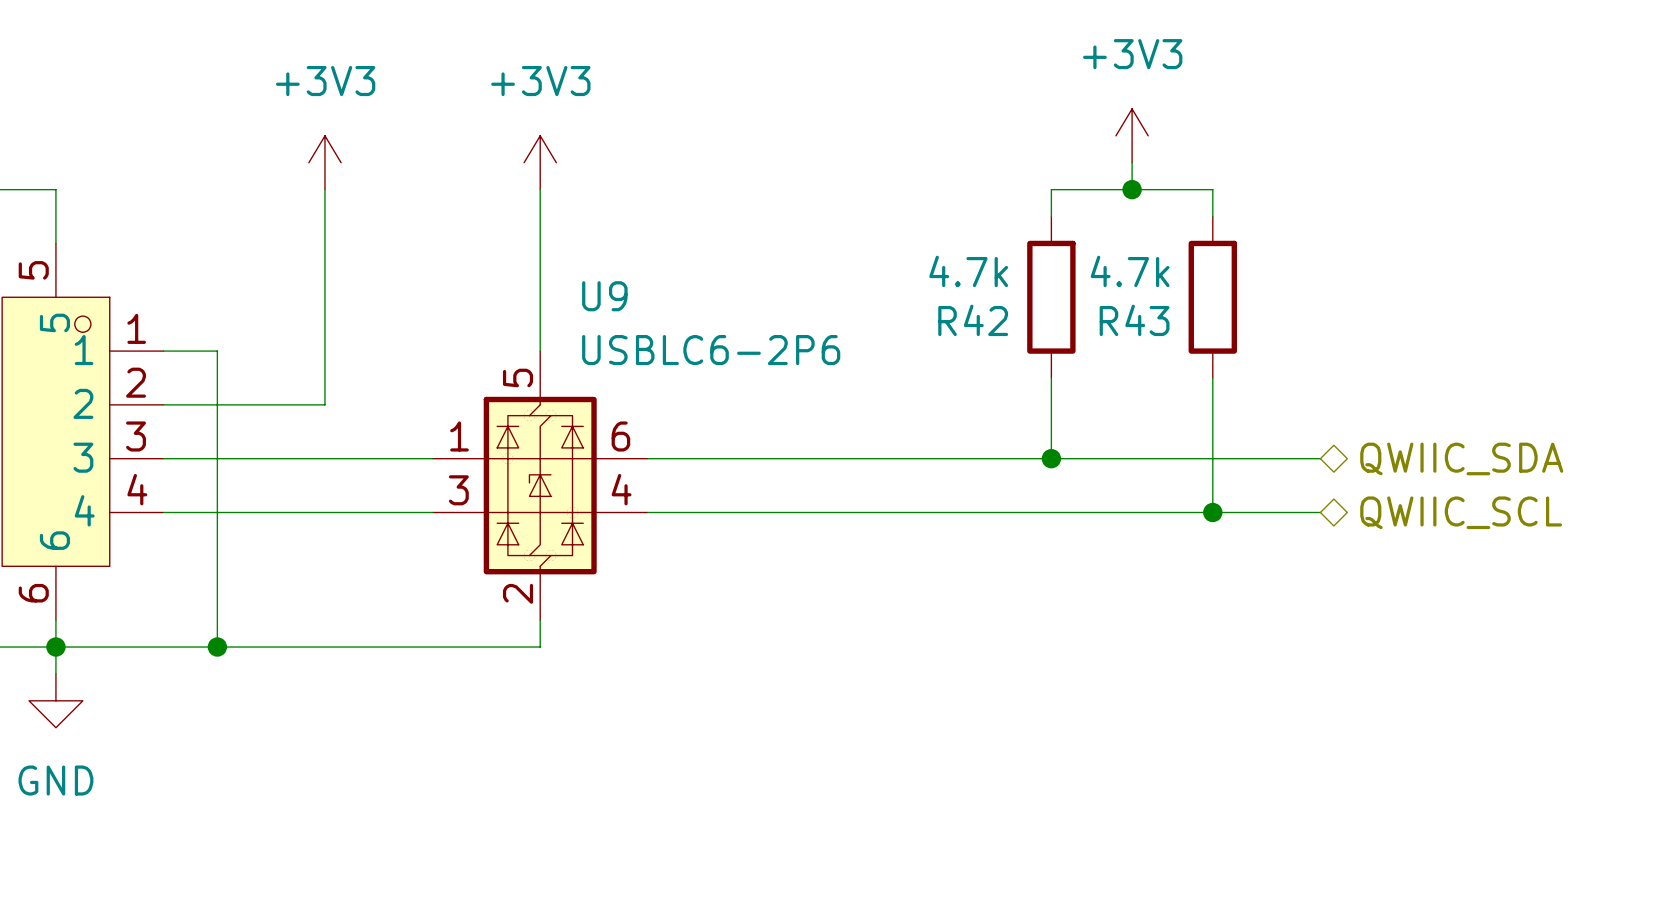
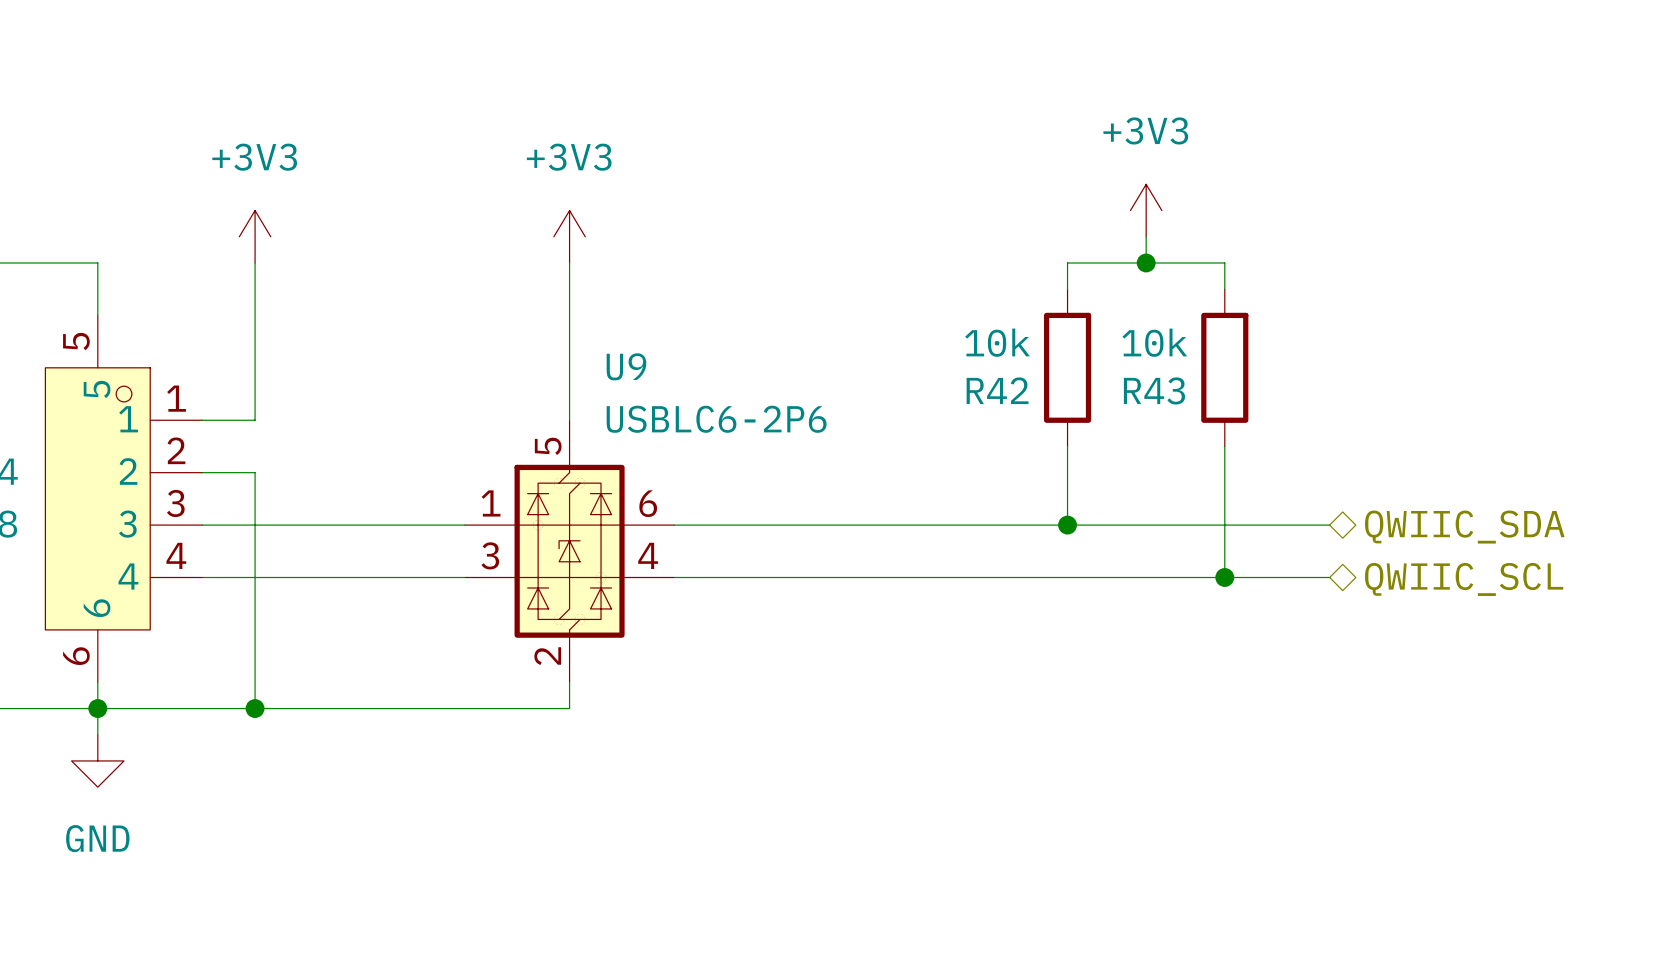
power symbol position: +3V3 (324, 162) -> +3V3 (255, 236)
wire: (324, 189) (324, 404) (217, 404) (217, 351) -> (255, 262) (255, 420)
R42 value: 4.7k (968, 271) -> 10k (997, 342)
R43 value: 4.7k (1130, 271) -> 10k (1154, 342)

